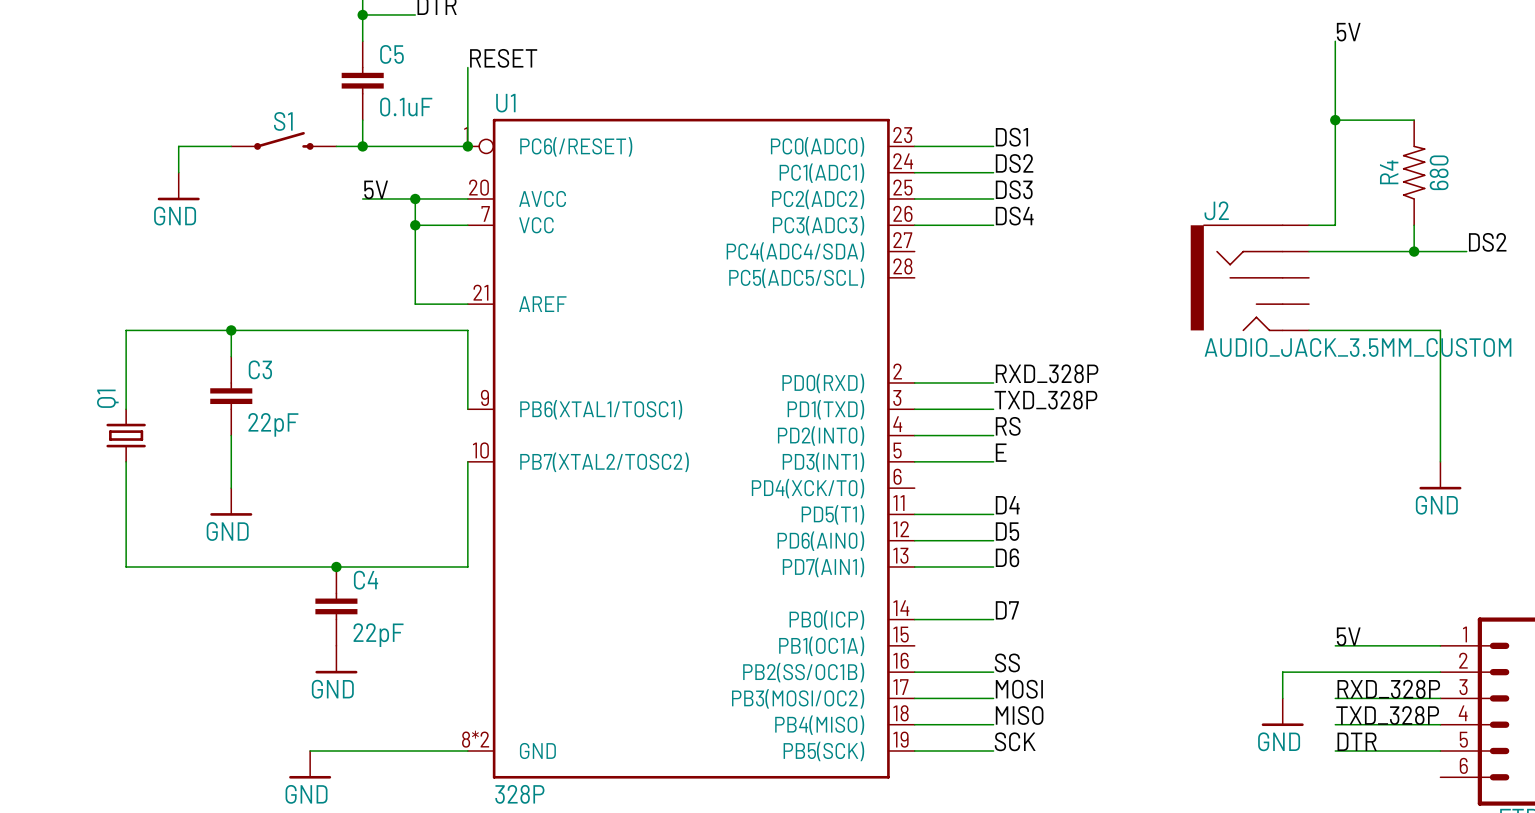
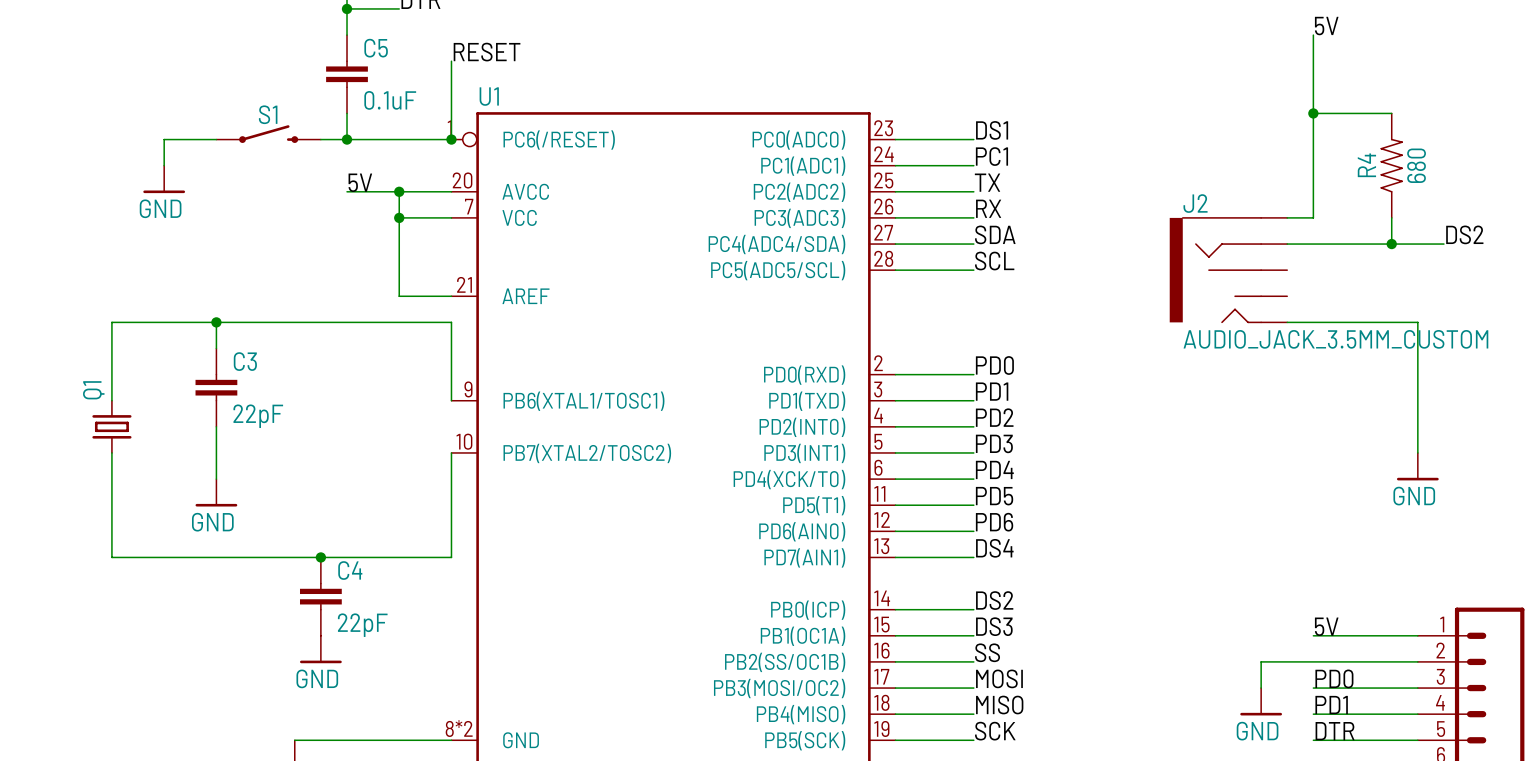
label: DS2 (1014, 163) -> PC1 (991, 156)
label: DS3 (1014, 189) -> TX (987, 182)
label: DS4 (1014, 216) -> RX (988, 208)
label: none -> SDA (995, 234)
wire: none -> (895, 244) (973, 244)
label: none -> SCL (994, 261)
wire: none -> (895, 270) (973, 270)
label: RXD_328P (1047, 373) -> PD0 (994, 365)
label: TXD_328P (1045, 400) -> PD1 (992, 391)
label: RS (1008, 426) -> PD2 (994, 417)
label: E (1001, 452) -> PD3 (994, 443)
label: none -> PD4 (994, 469)
wire: none -> (895, 479) (973, 479)
label: D4 (1007, 505) -> PD5 (994, 496)
label: D5 (1007, 531) -> PD6 (994, 522)
label: D6 (1007, 557) -> DS4 (994, 548)
label: D7 (1007, 610) -> DS2 (994, 600)
label: none -> DS3 (994, 626)
wire: none -> (895, 635) (973, 635)
label: RXD_328P (1388, 689) -> PD0 (1334, 678)
label: TXD_328P (1387, 715) -> PD1 (1331, 705)

